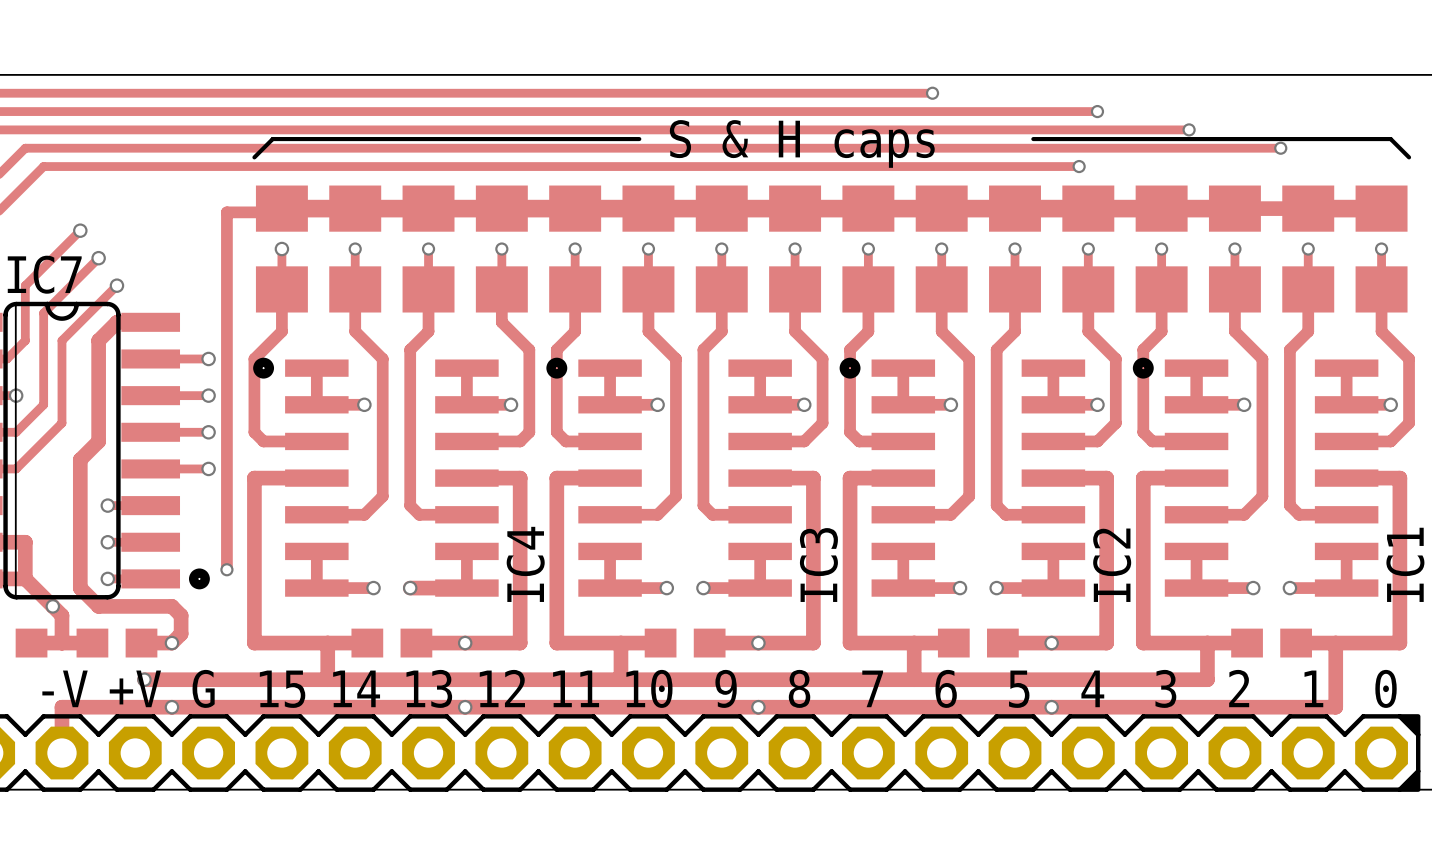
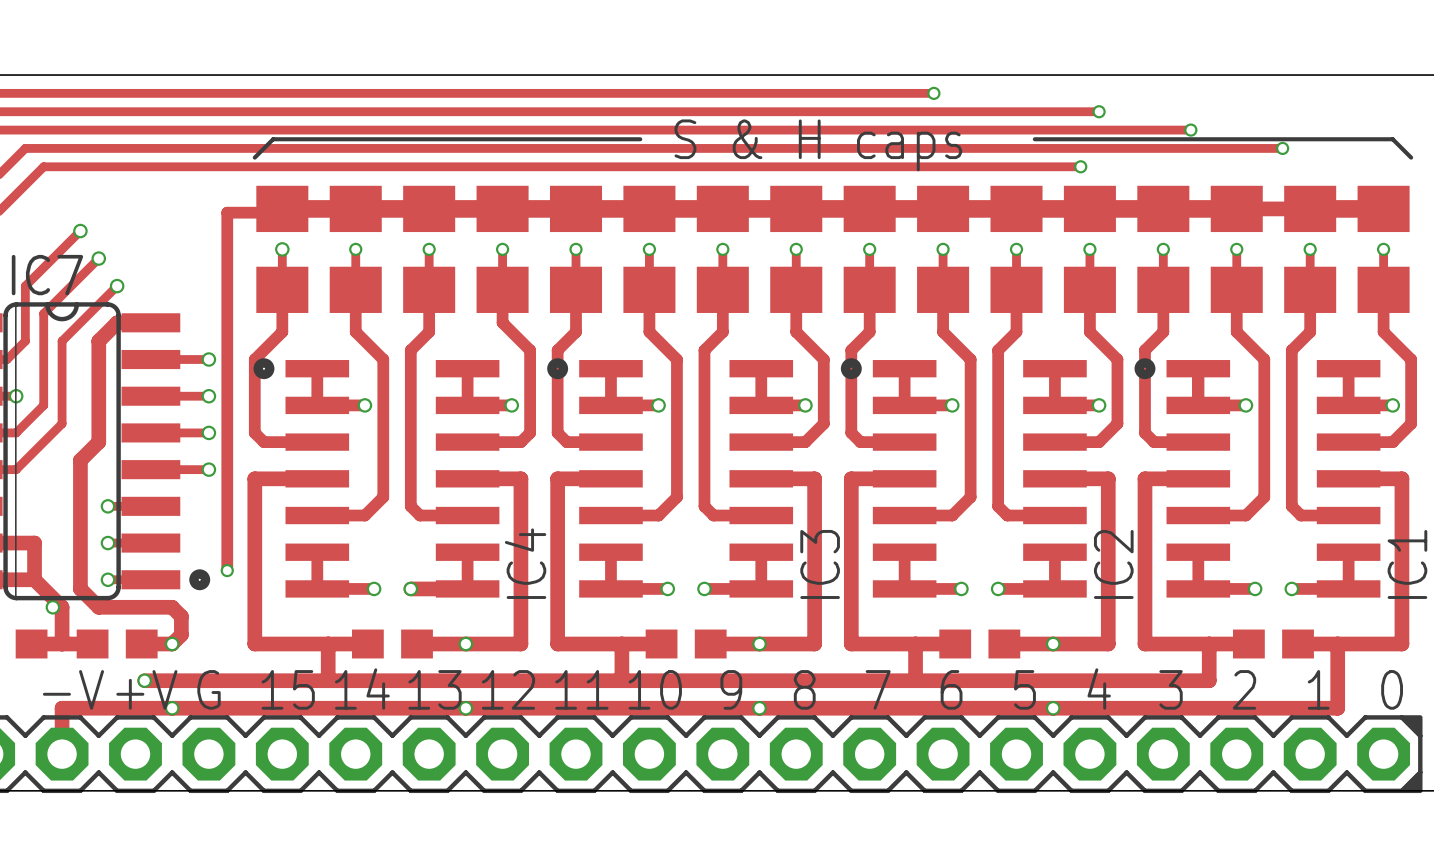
track: (25, 542) (25, 578) (61, 615) -> (34, 579) (62, 607) (62, 616)
track: none -> (25, 543) (34, 543) (34, 579)

